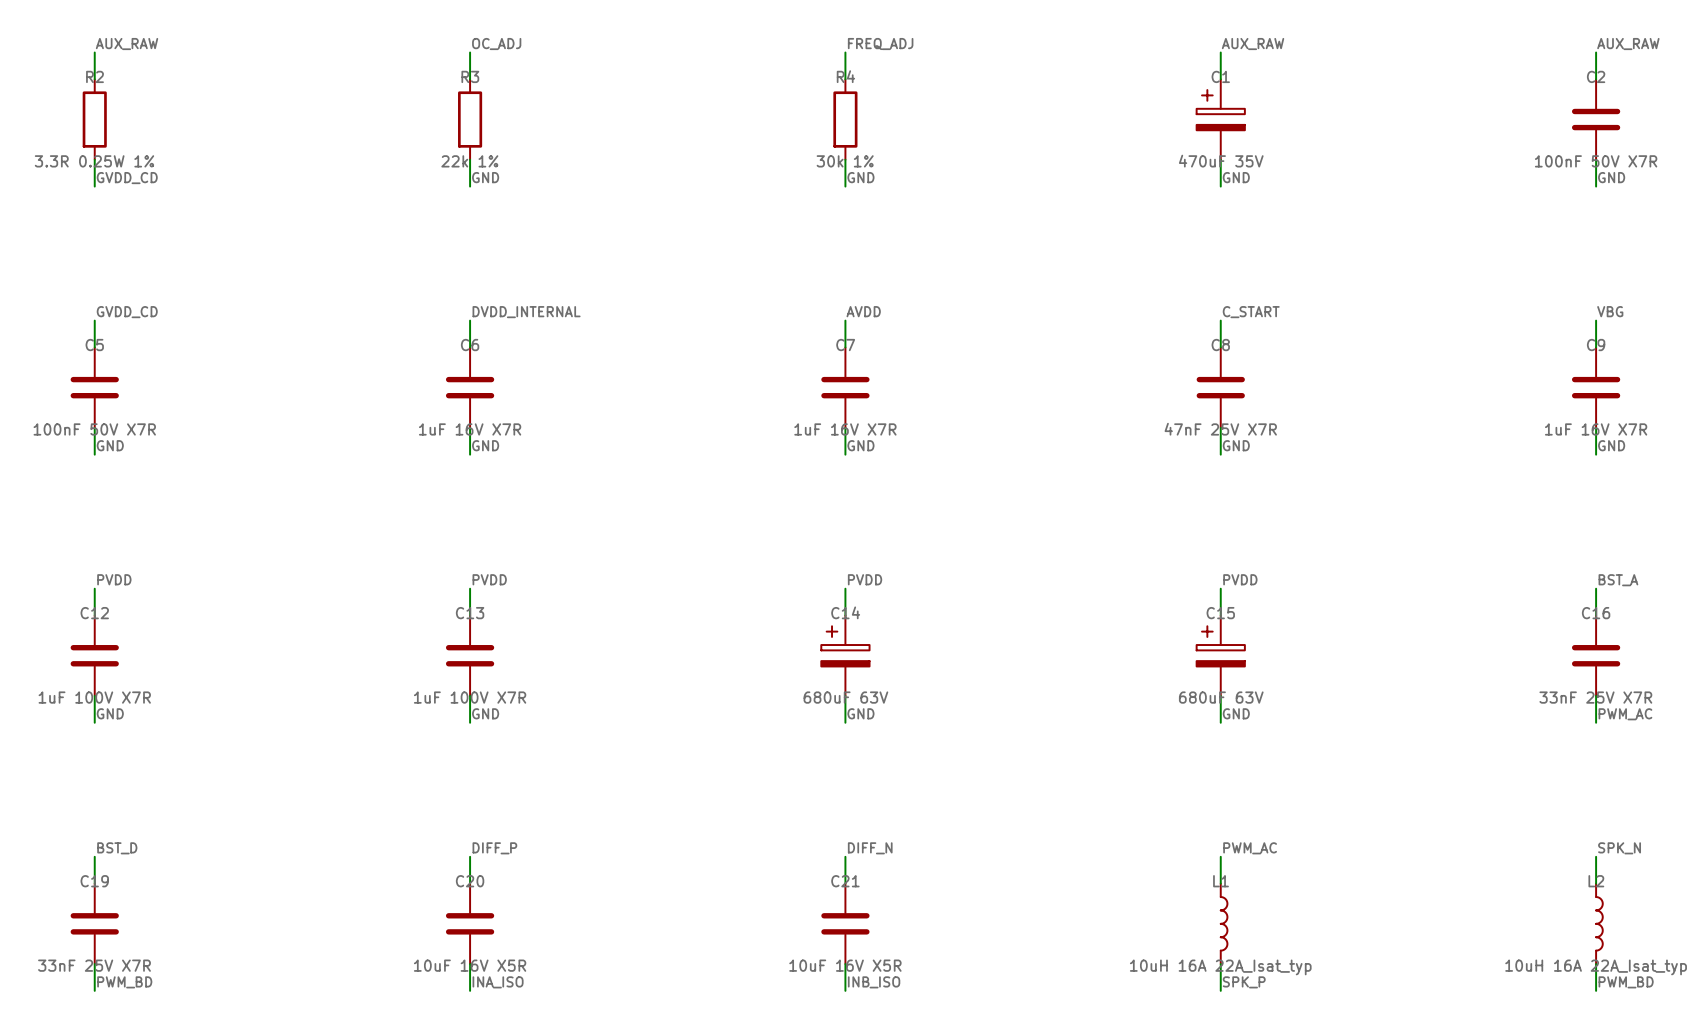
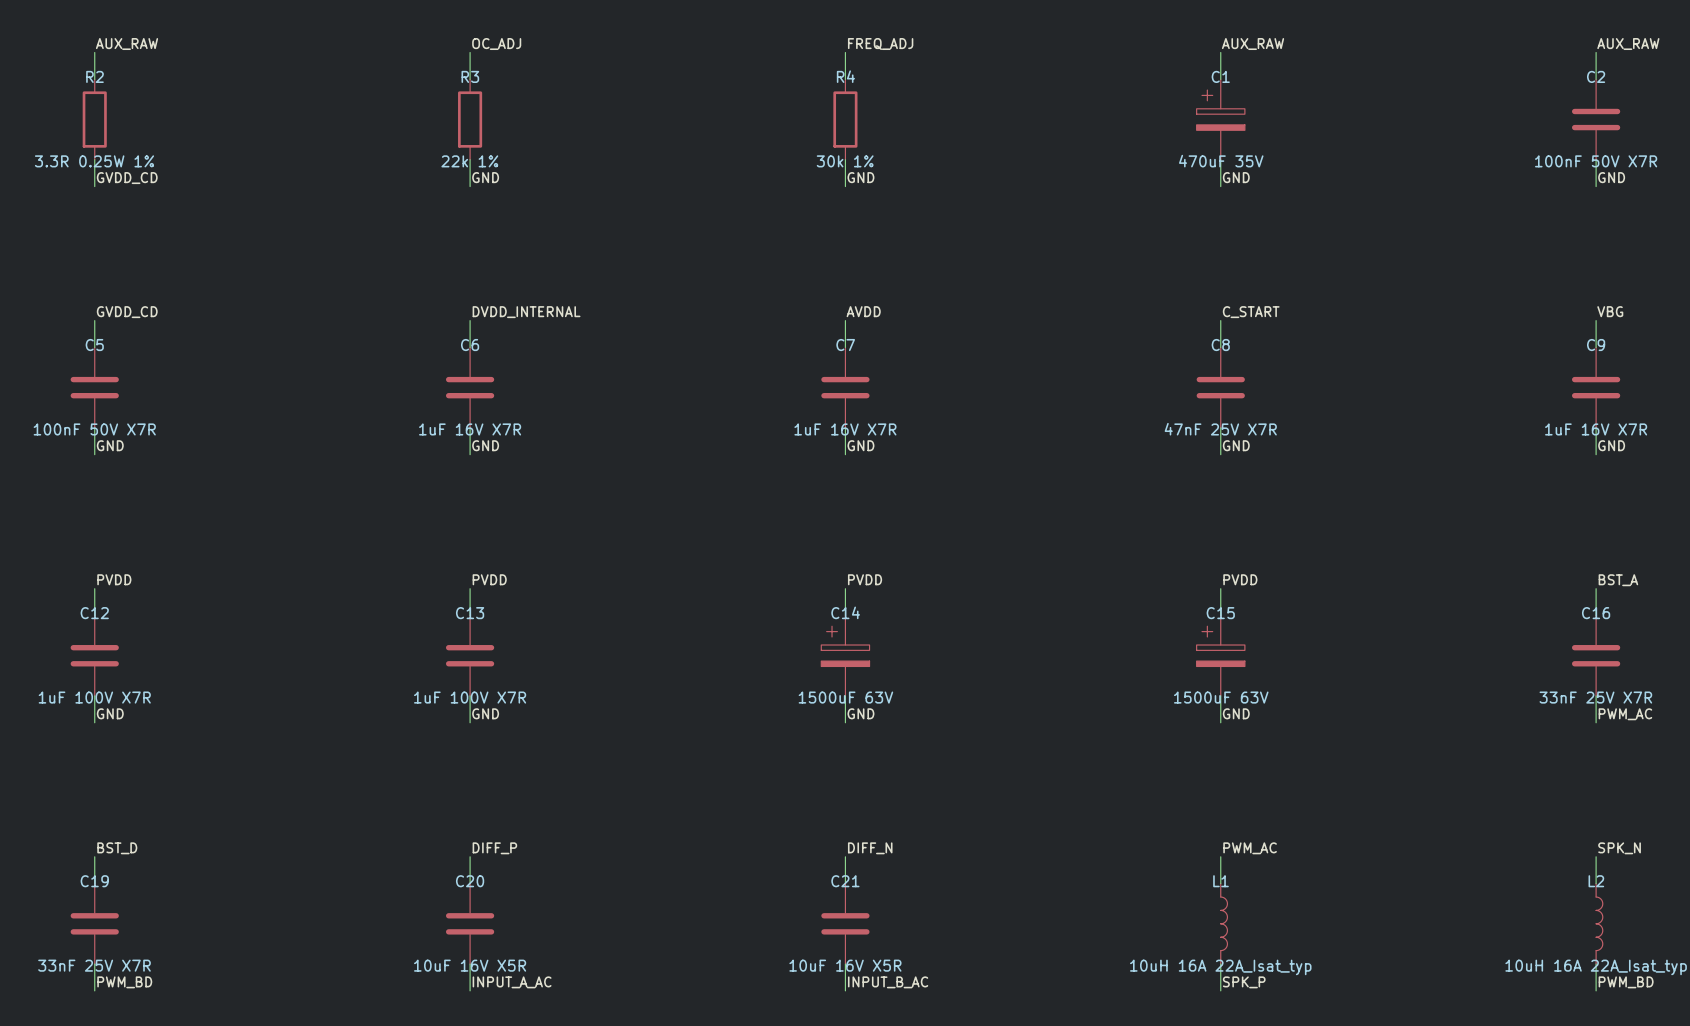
C14 value: 680uF 63V (845, 697) -> 1500uF 63V (845, 697)
C15 value: 680uF 63V (1221, 697) -> 1500uF 63V (1221, 697)
label: INA_ISO (498, 982) -> INPUT_A_AC (512, 982)
label: INB_ISO (874, 982) -> INPUT_B_AC (888, 982)

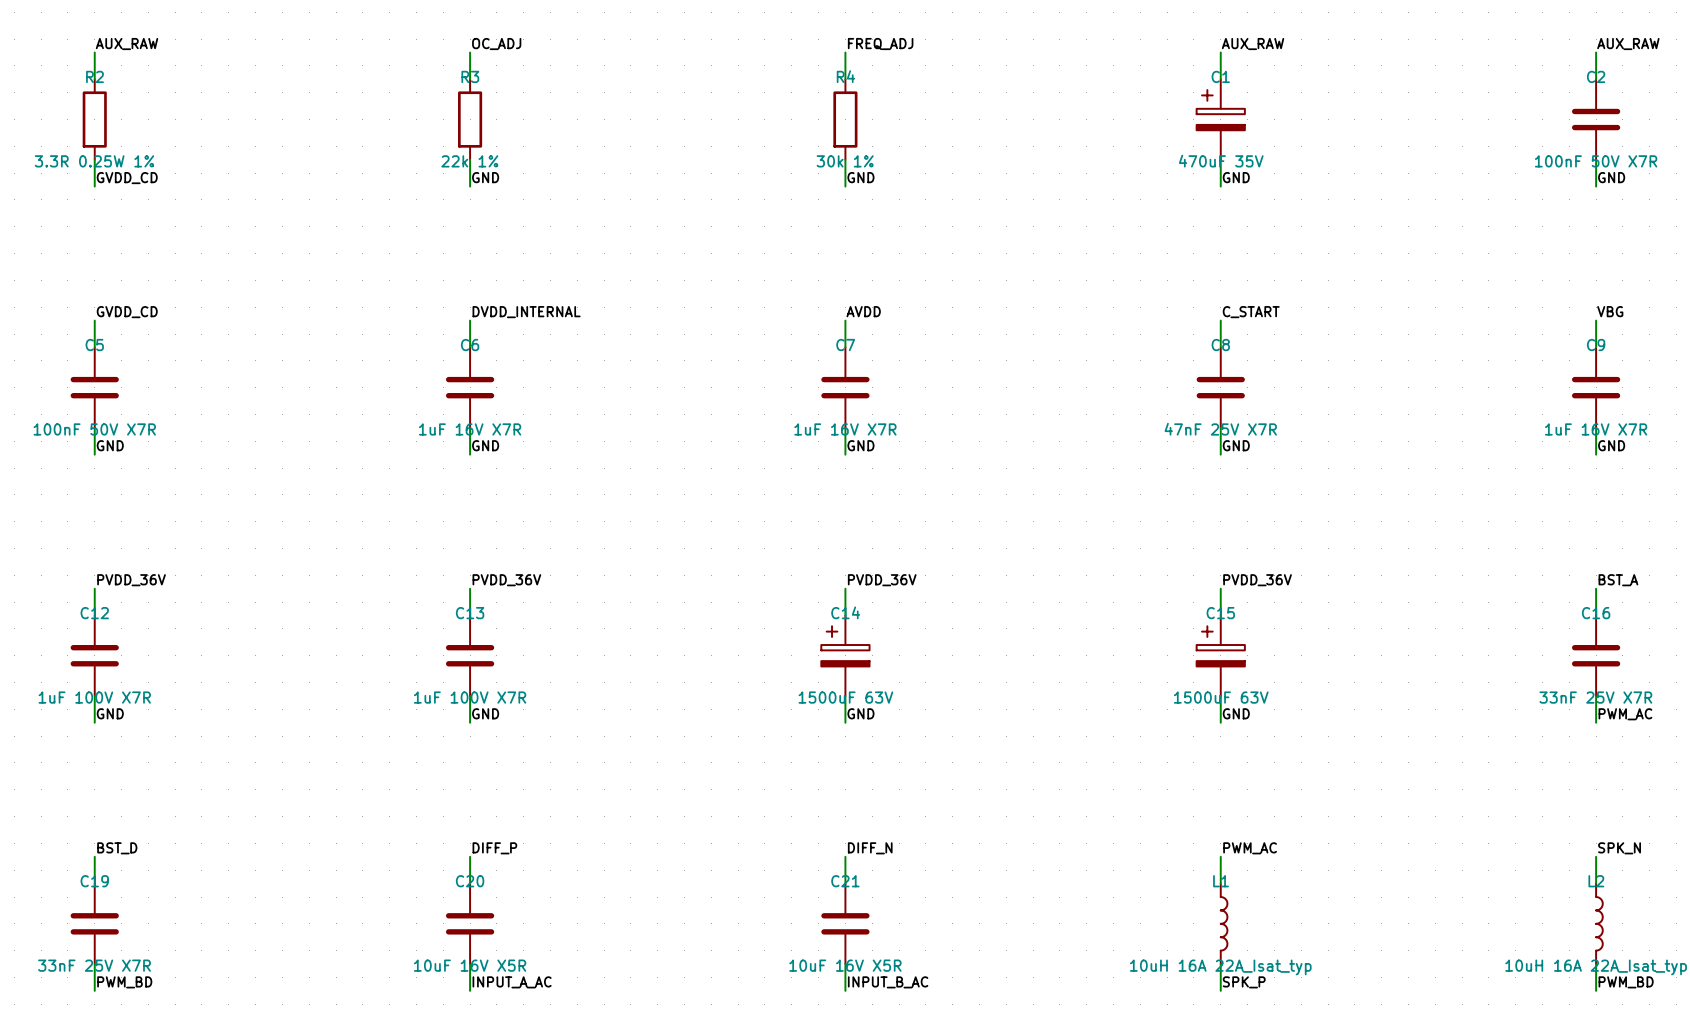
label: PVDD (114, 579) -> PVDD_36V (131, 580)
label: PVDD (489, 579) -> PVDD_36V (506, 580)
label: PVDD (865, 579) -> PVDD_36V (882, 580)
label: PVDD (1240, 579) -> PVDD_36V (1257, 580)

